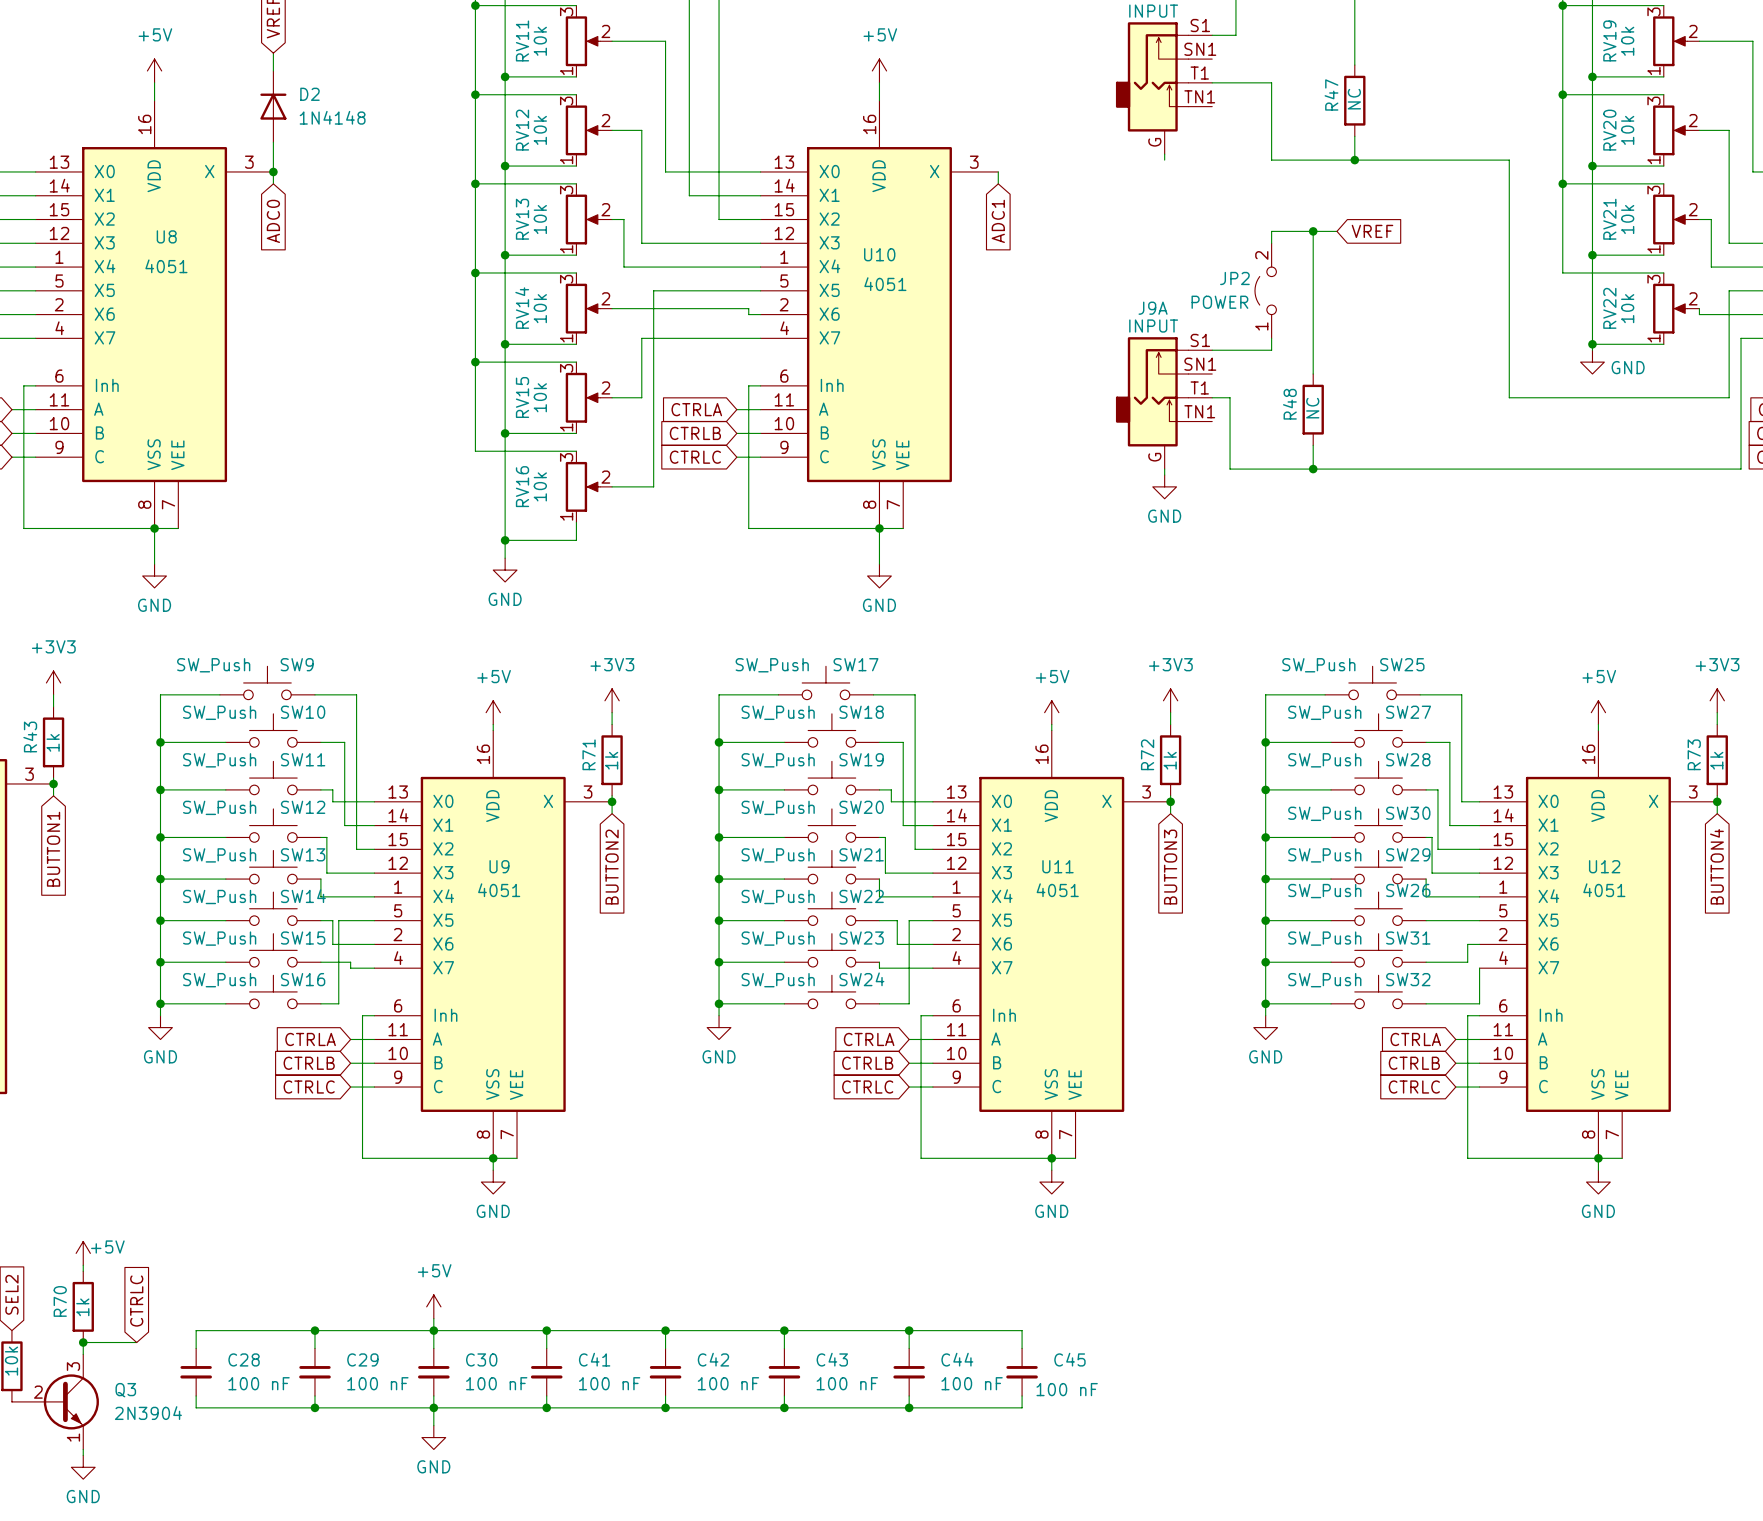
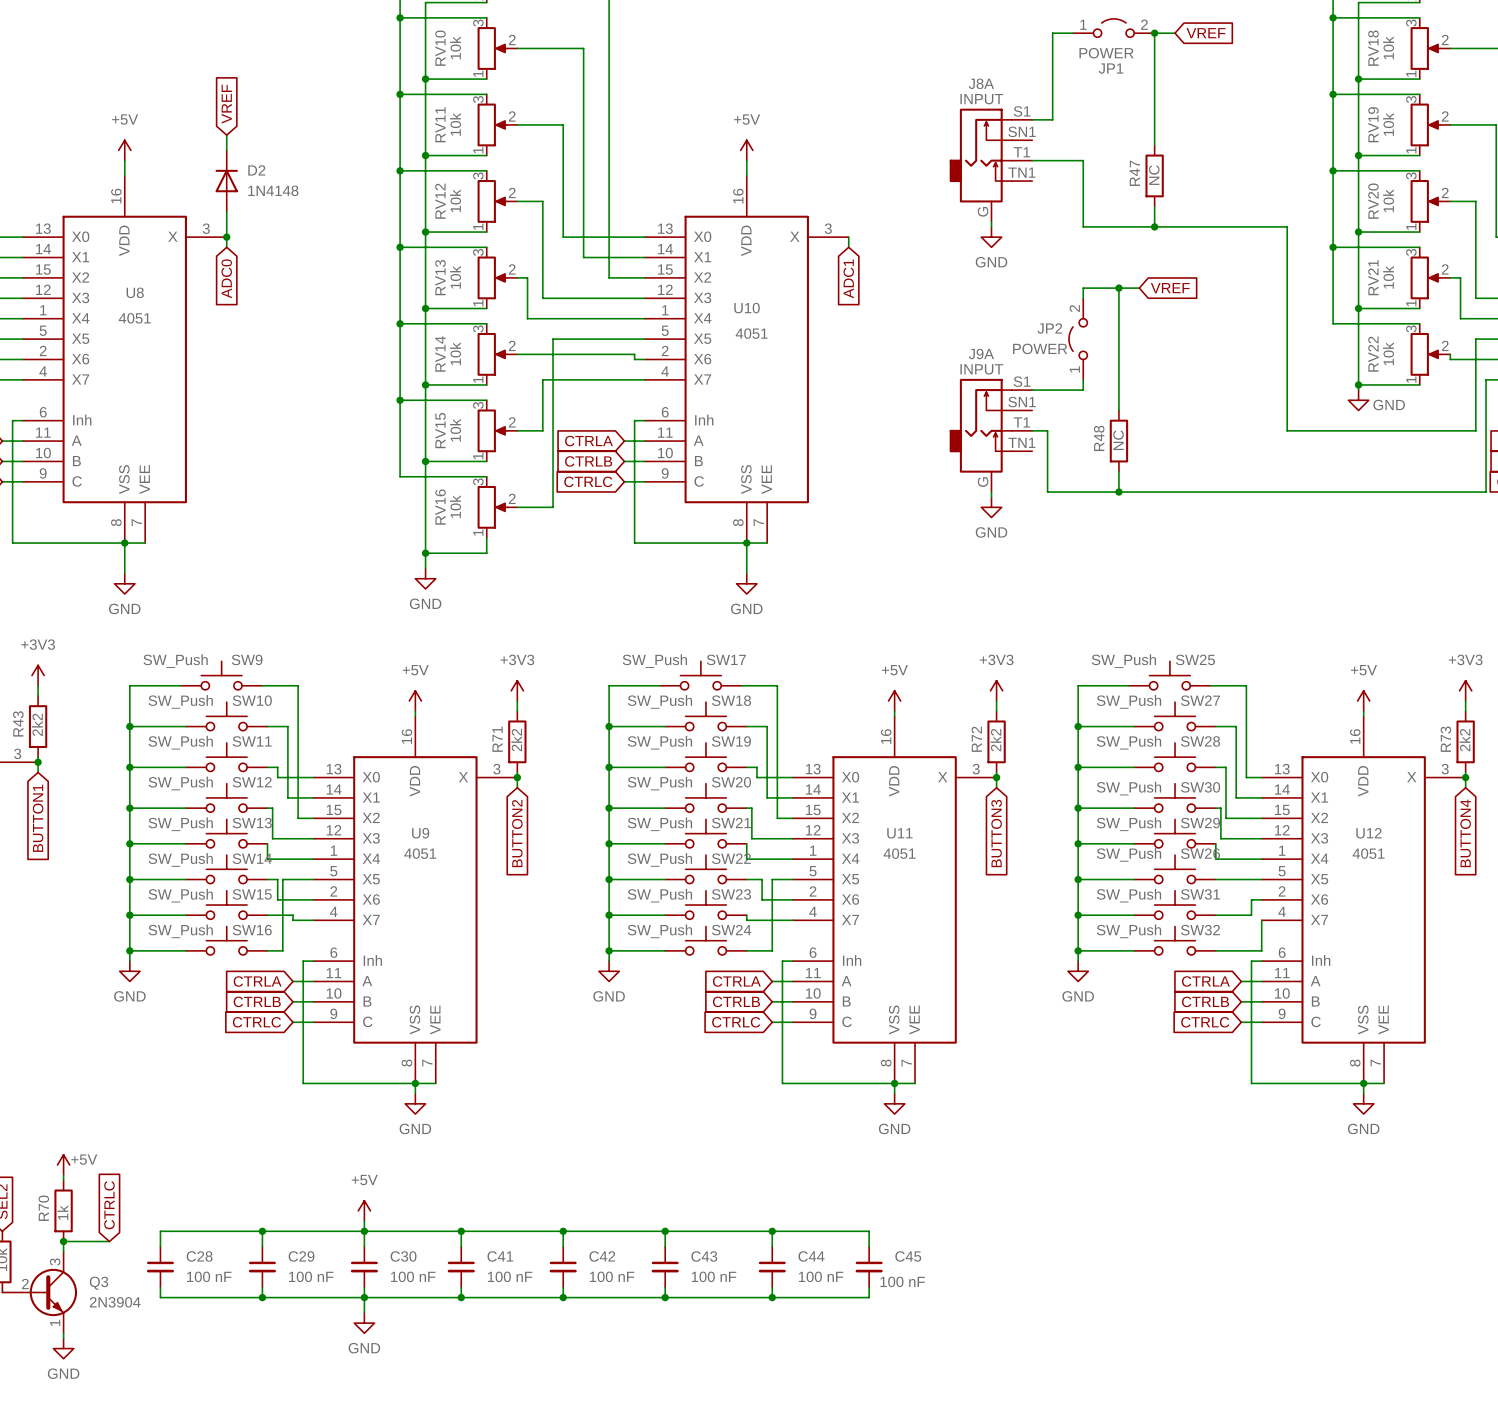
power symbol: none -> GND (991, 237)
R43 value: 1k (53, 742) -> 2k2 (37, 724)
R71 value: 1k (611, 760) -> 2k2 (516, 740)
R72 value: 1k (1170, 760) -> 2k2 (995, 740)
R73 value: 1k (1716, 760) -> 2k2 (1464, 740)

